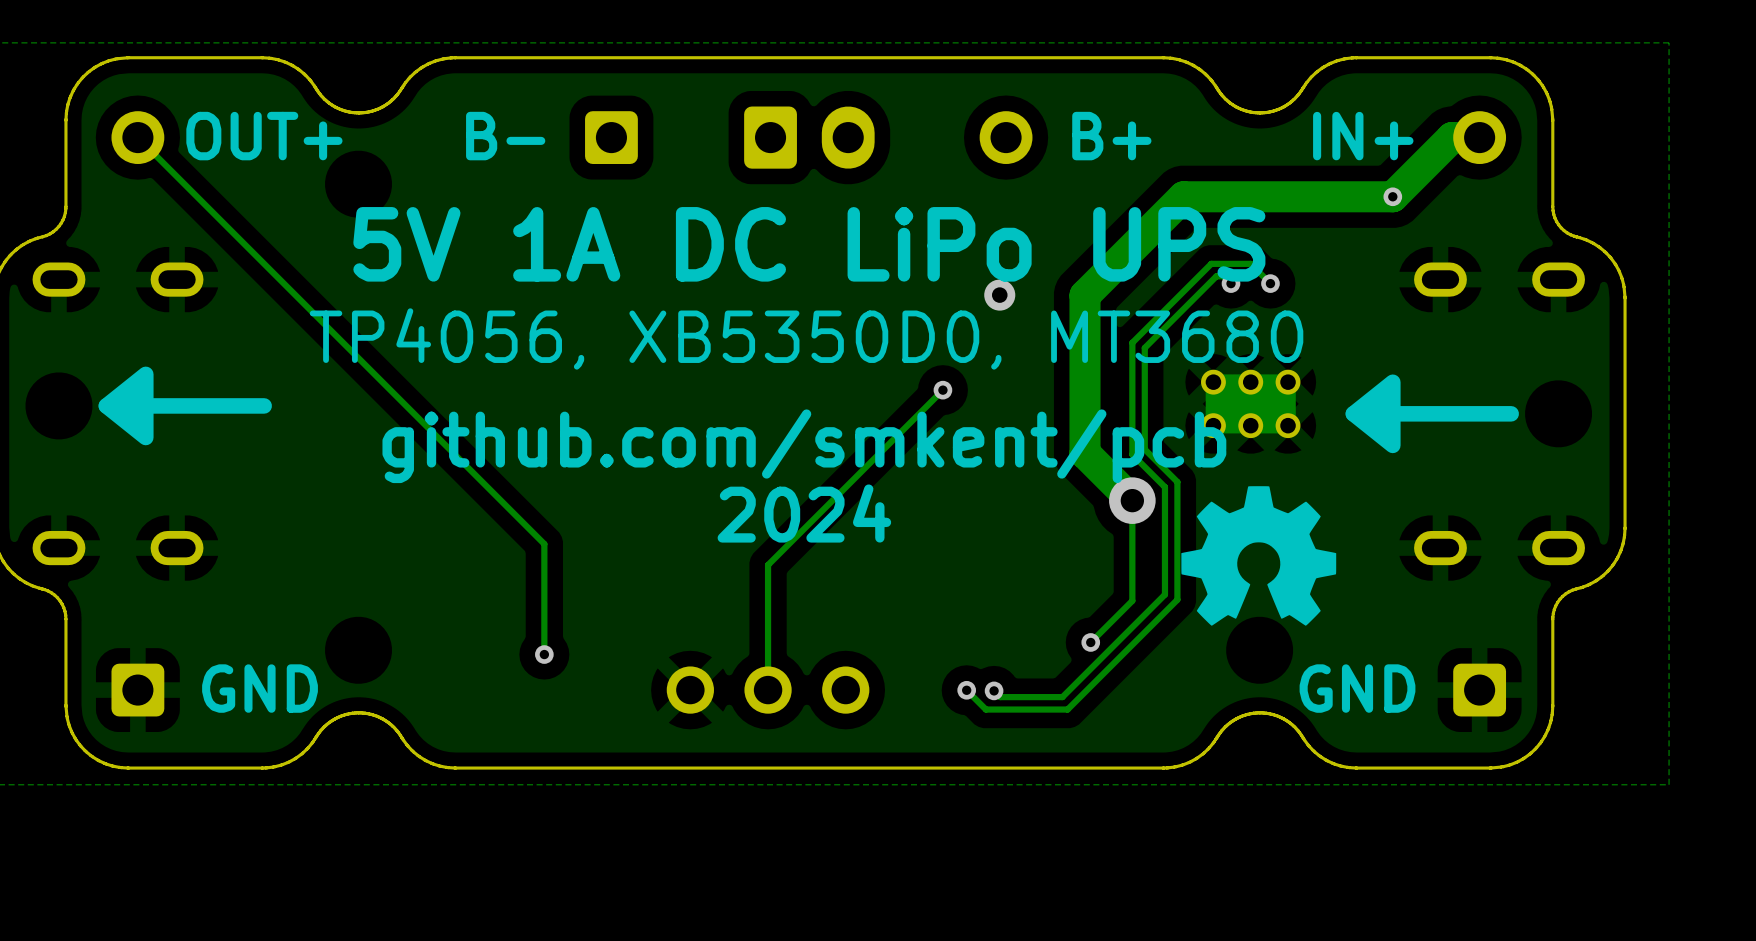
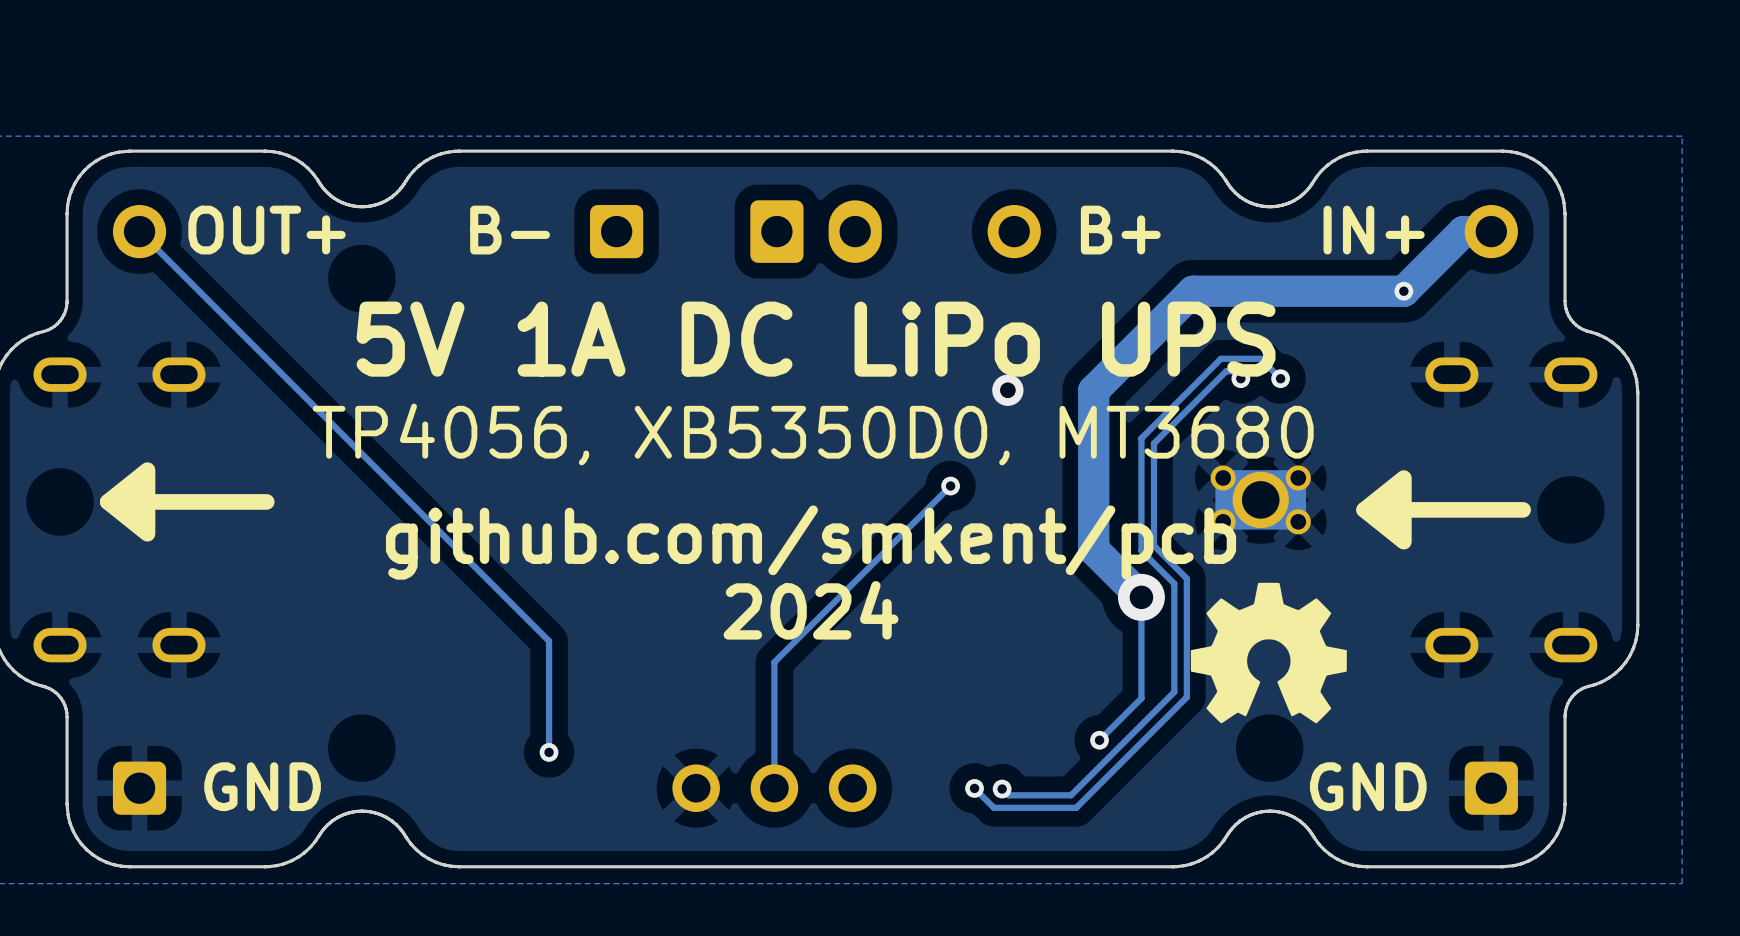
part footprint: [1201, 369, 1301, 439] -> [1210, 465, 1311, 535]

